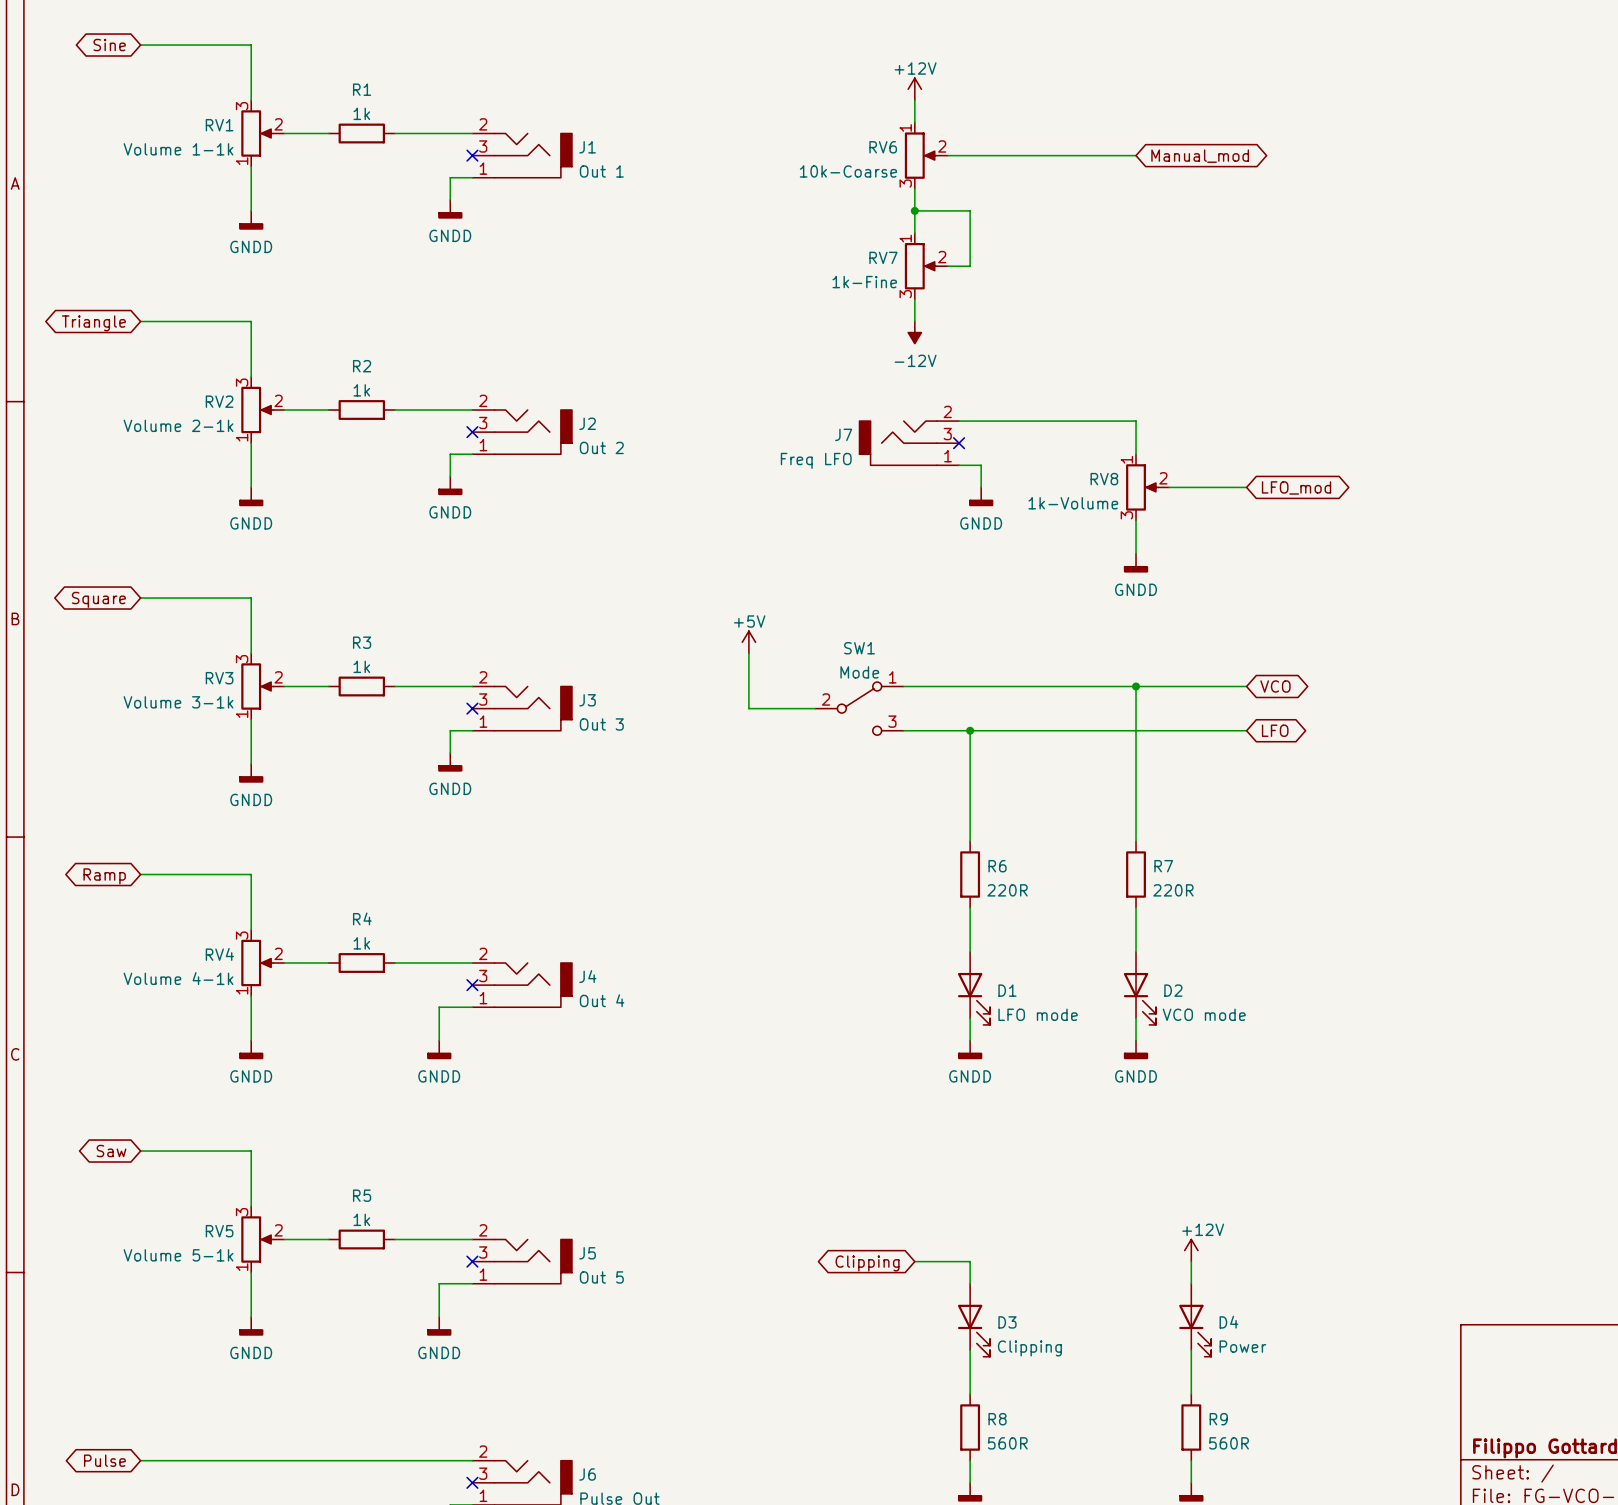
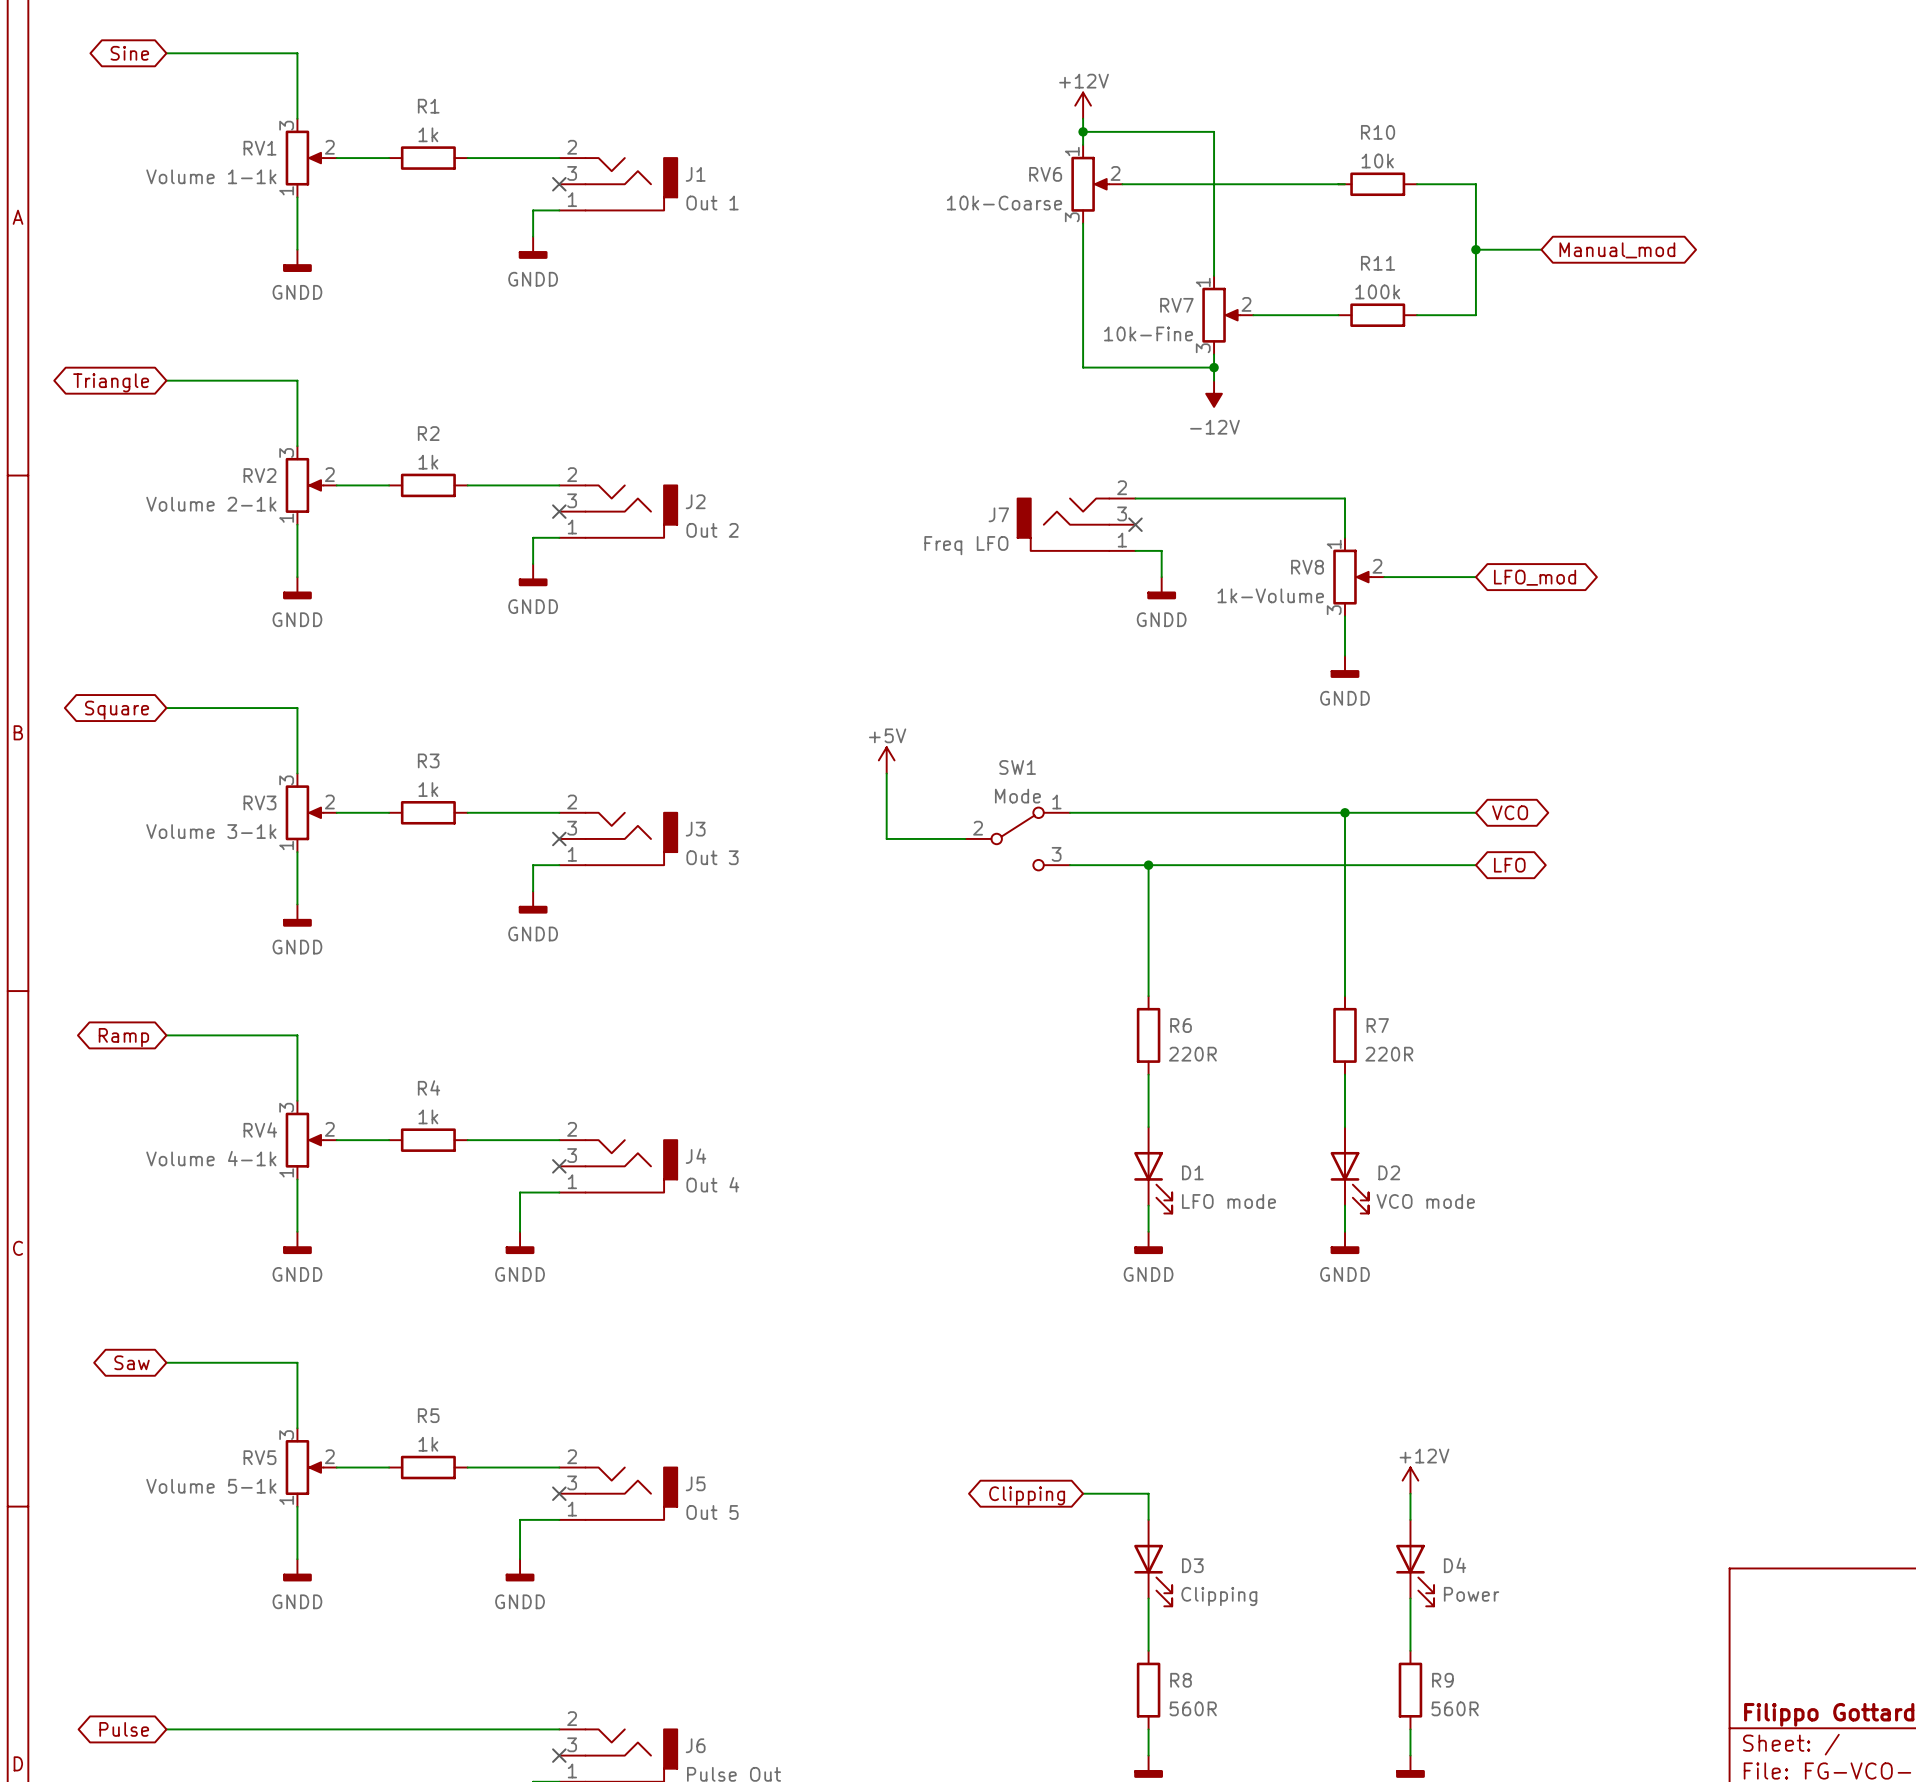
wire: none -> (1083, 131) (1214, 131) (1214, 275)
junction: none -> (1083, 131)
R10: none -> 10k (1377, 184)
wire: none -> (1417, 184) (1475, 184) (1475, 315) (1417, 315)
global label position: Manual_mod (1200, 156) -> Manual_mod (1617, 250)
wire: (914, 210) (970, 210) (970, 266) (947, 266) -> none
junction: (914, 210) -> none
wire: none -> (1475, 249) (1541, 249)
junction: none -> (1475, 249)
wire: none -> (1083, 275) (1083, 354)
RV7 position: (926, 266) -> (1227, 315)
wire: none -> (1253, 315) (1338, 315)
R11: none -> 100k (1377, 315)
RV7 value: 1k-Fine (864, 282) -> 10k-Fine (1148, 333)
wire: none -> (1214, 354) (1214, 380)
wire: (914, 310) (914, 321) -> (1083, 367) (1214, 367)
junction: none -> (1214, 367)
power symbol position: -12V (914, 332) -> -12V (1214, 393)

